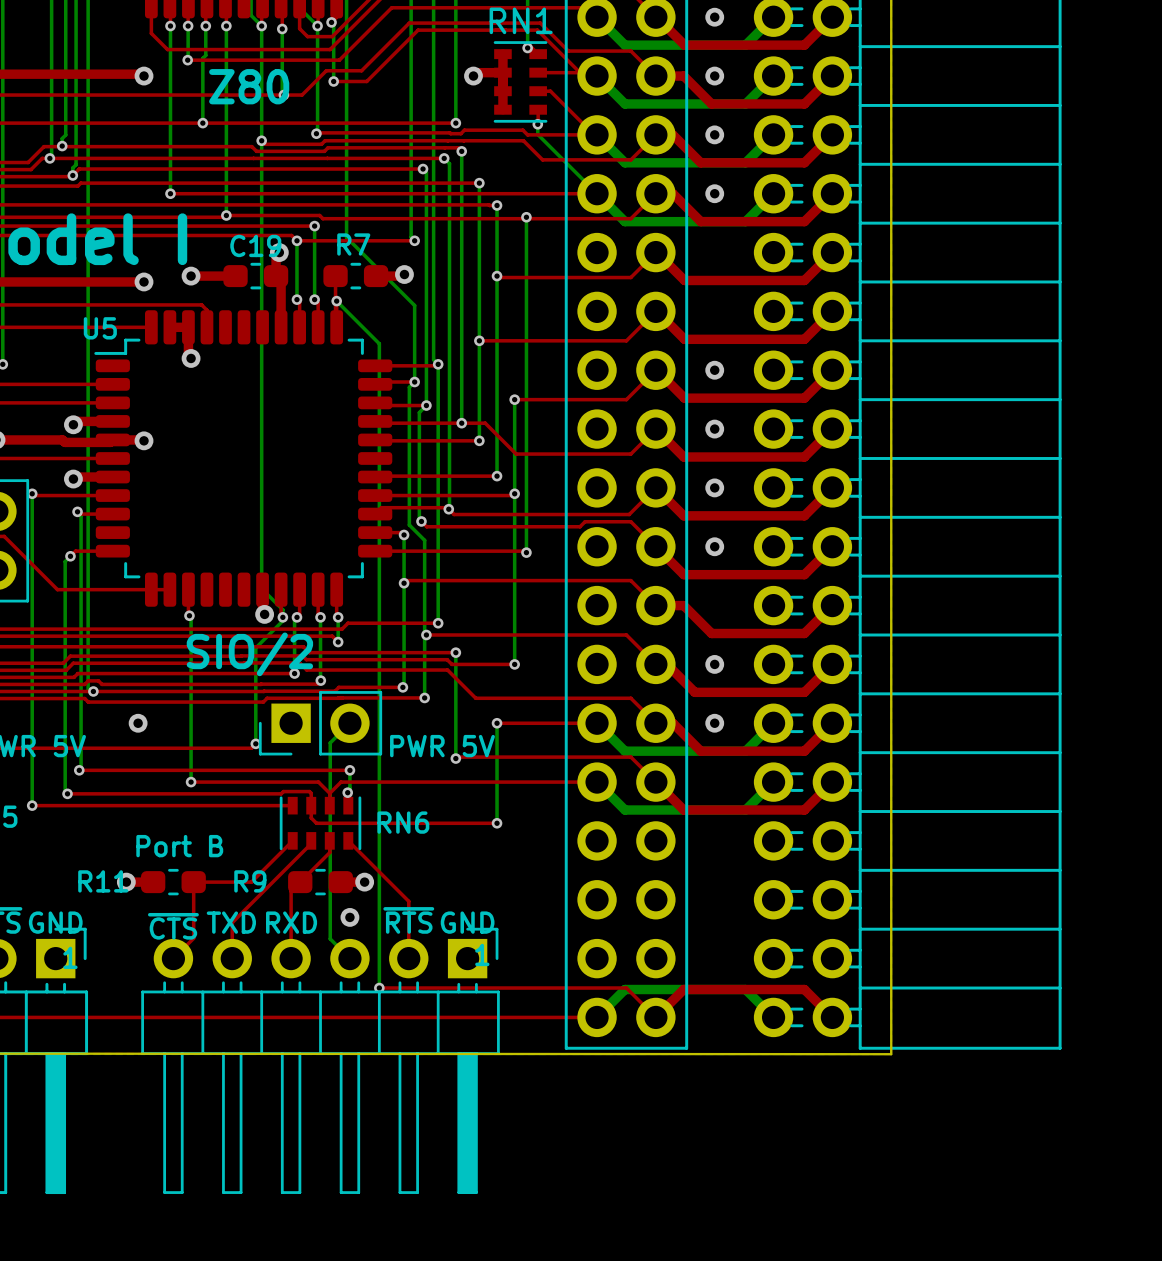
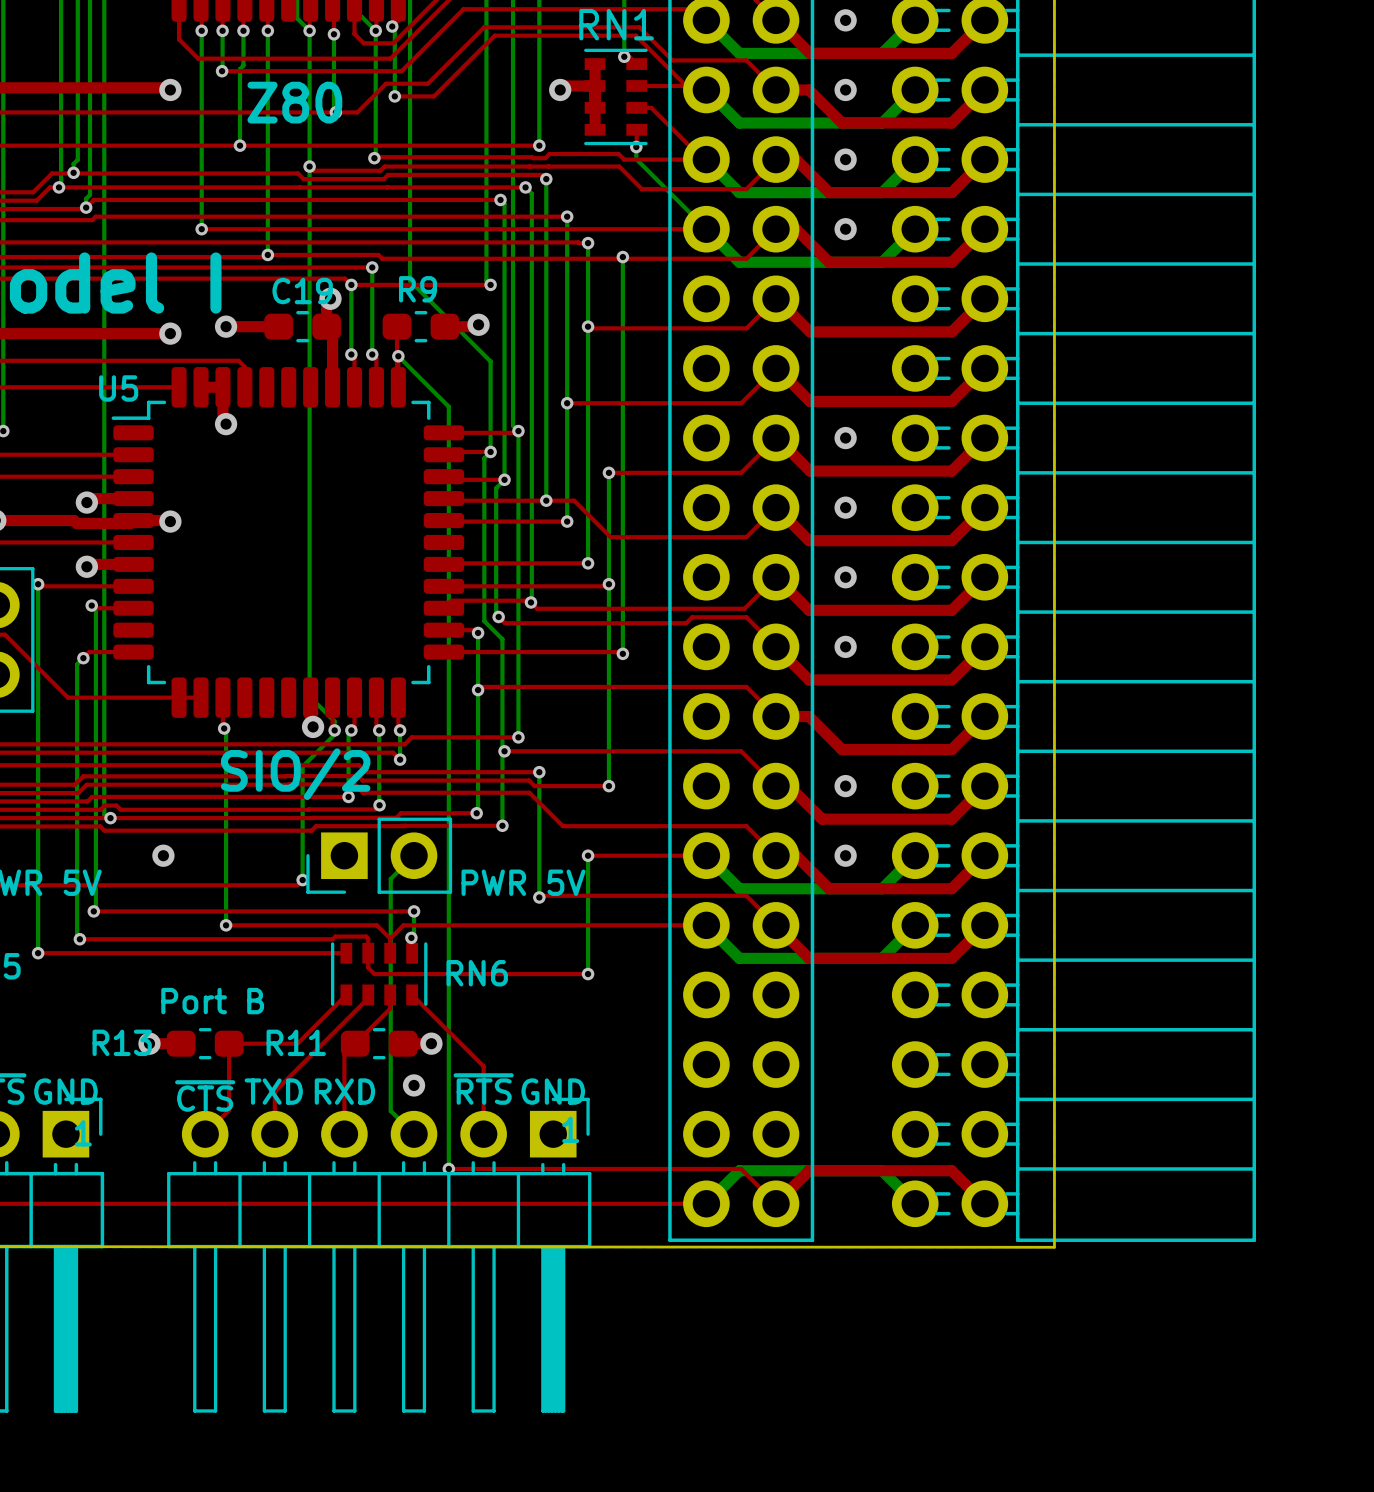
R7 name: R7 (353, 244) -> R9 (418, 289)
R11 name: R11 (103, 881) -> R13 (122, 1042)
R9 name: R9 (250, 881) -> R11 (296, 1042)

